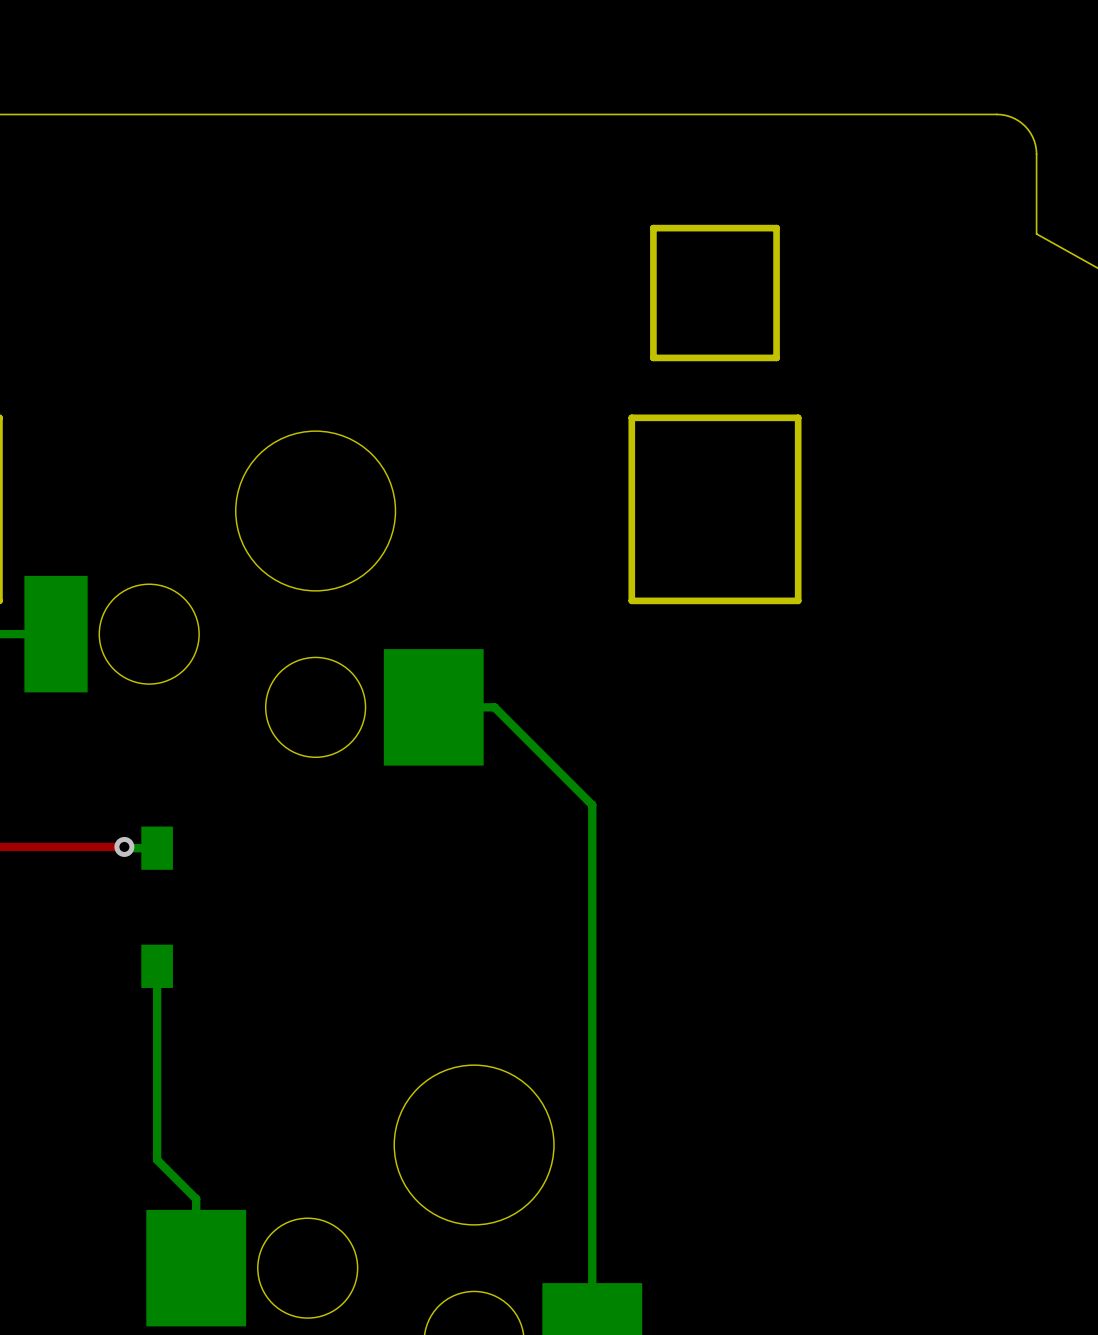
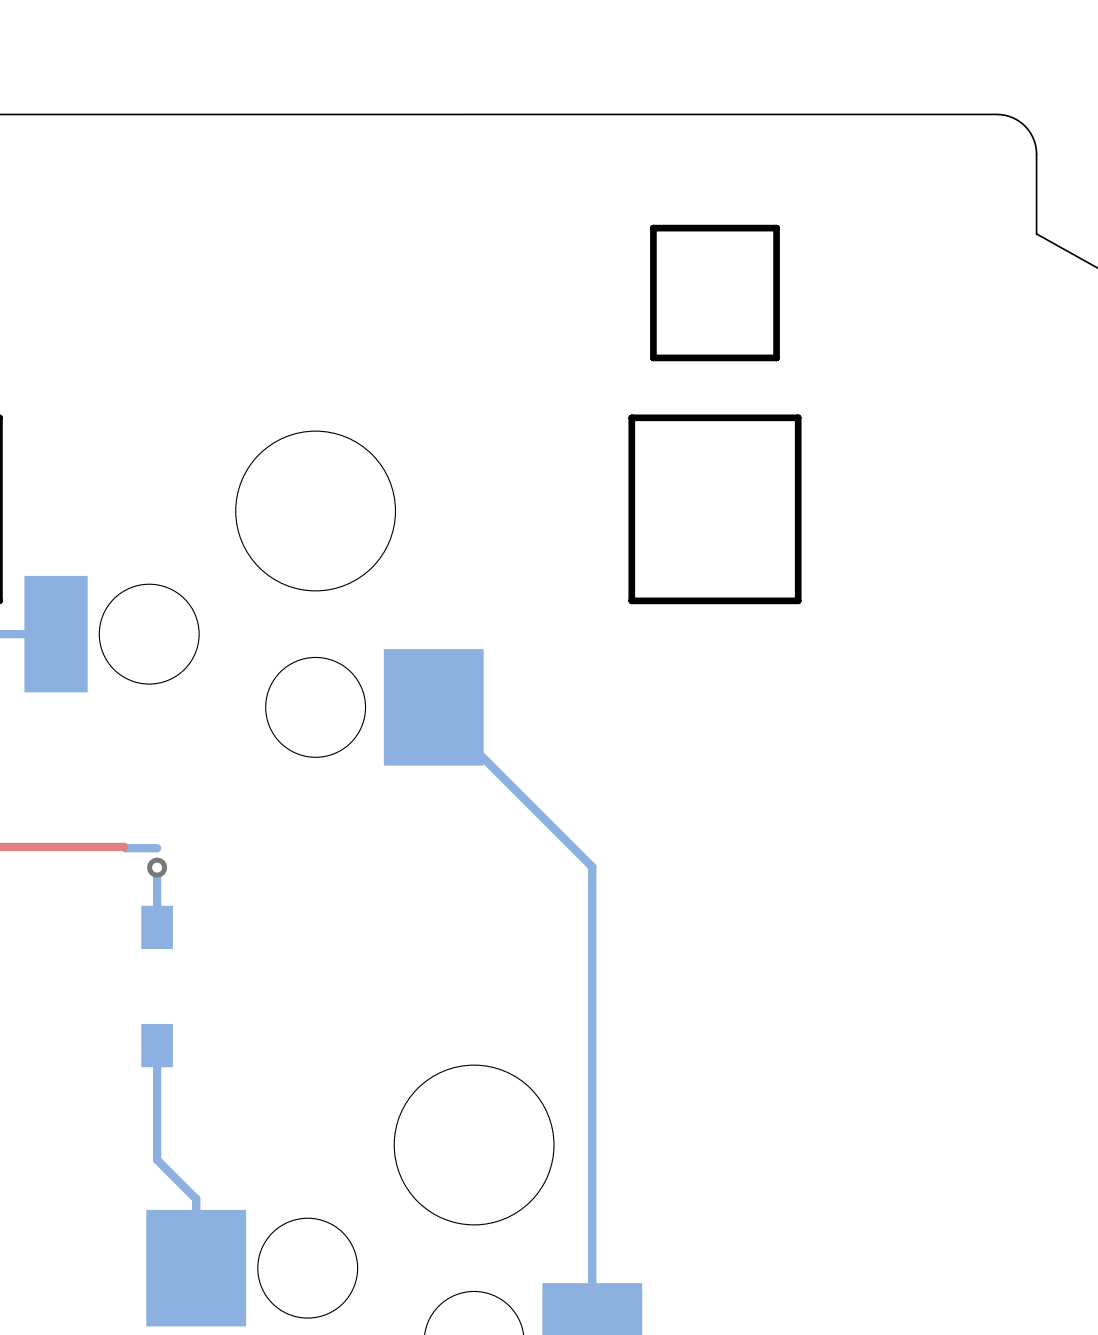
bottom track: (433, 707) (494, 707) (592, 805) (592, 866) -> (408, 707) (432, 707) (592, 866)
via position: (124, 846) -> (157, 867)
bottom track: none -> (157, 867) (157, 927)
part position: (157, 907) -> (157, 986)
bottom track: (157, 966) (157, 1045) -> none

